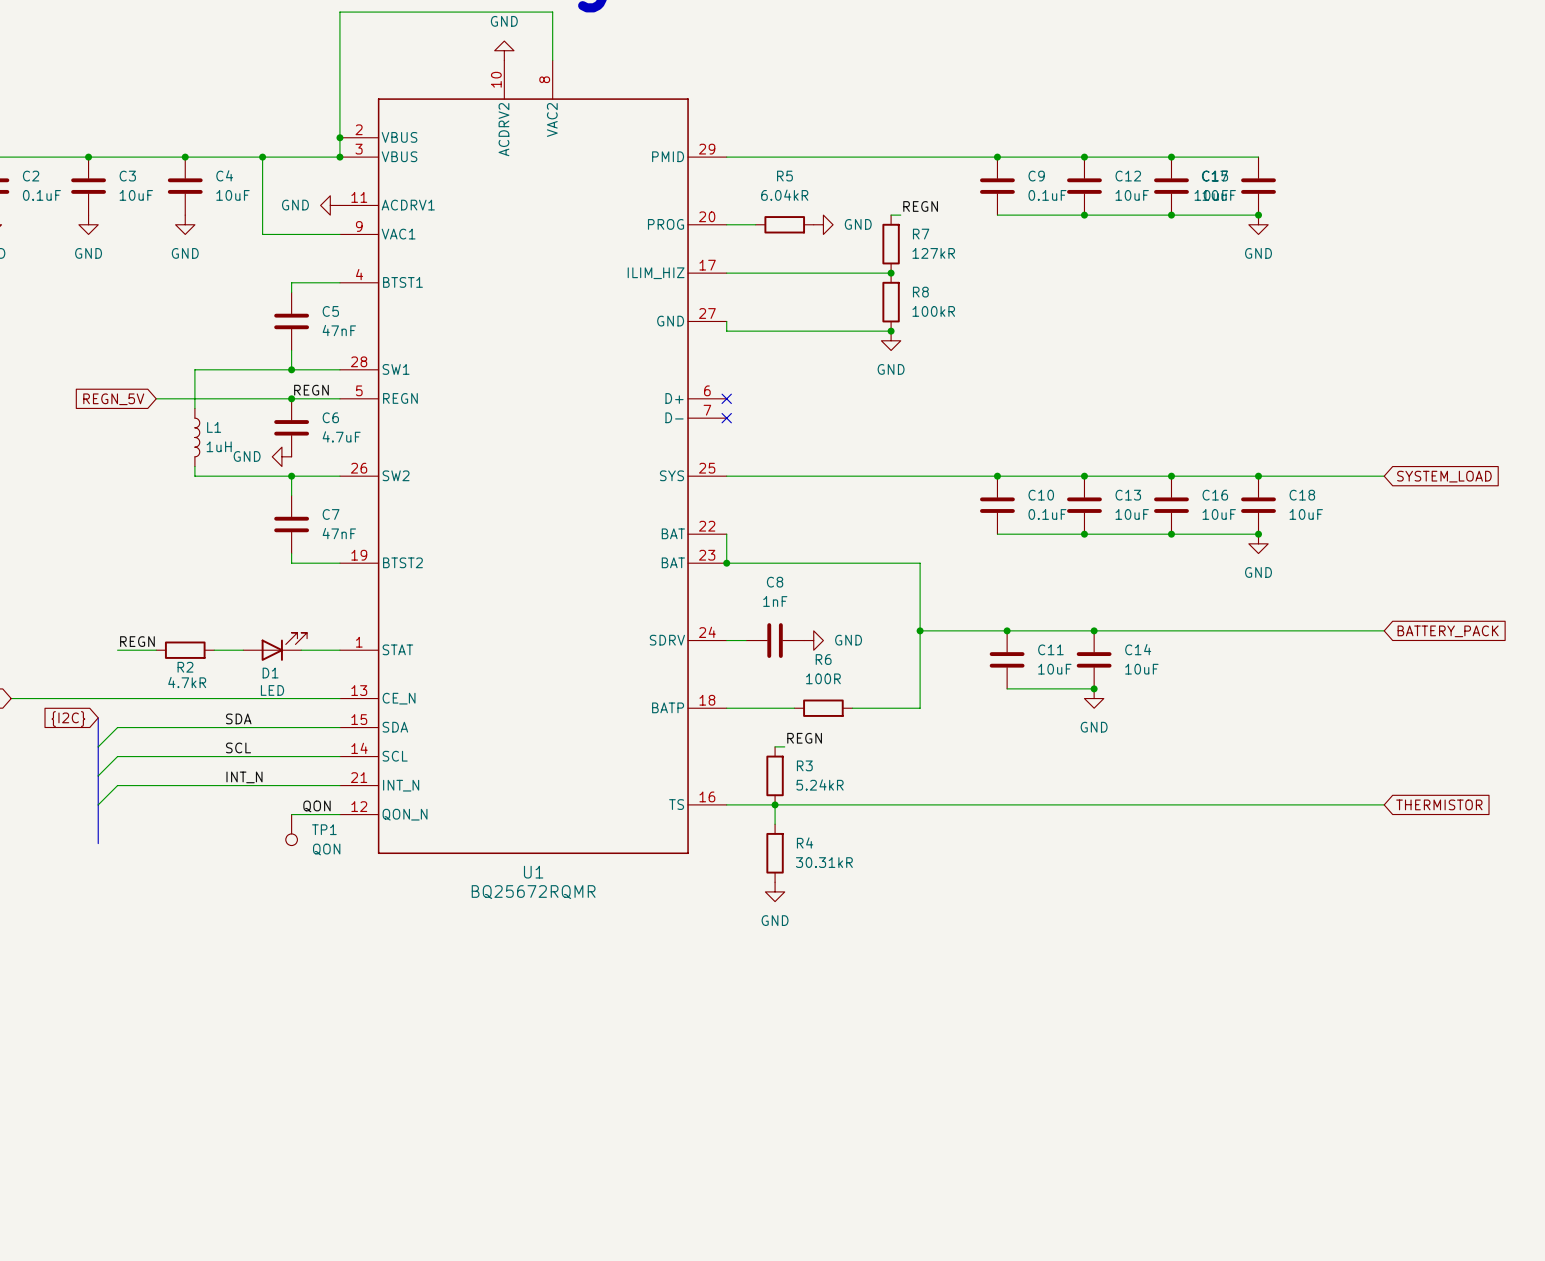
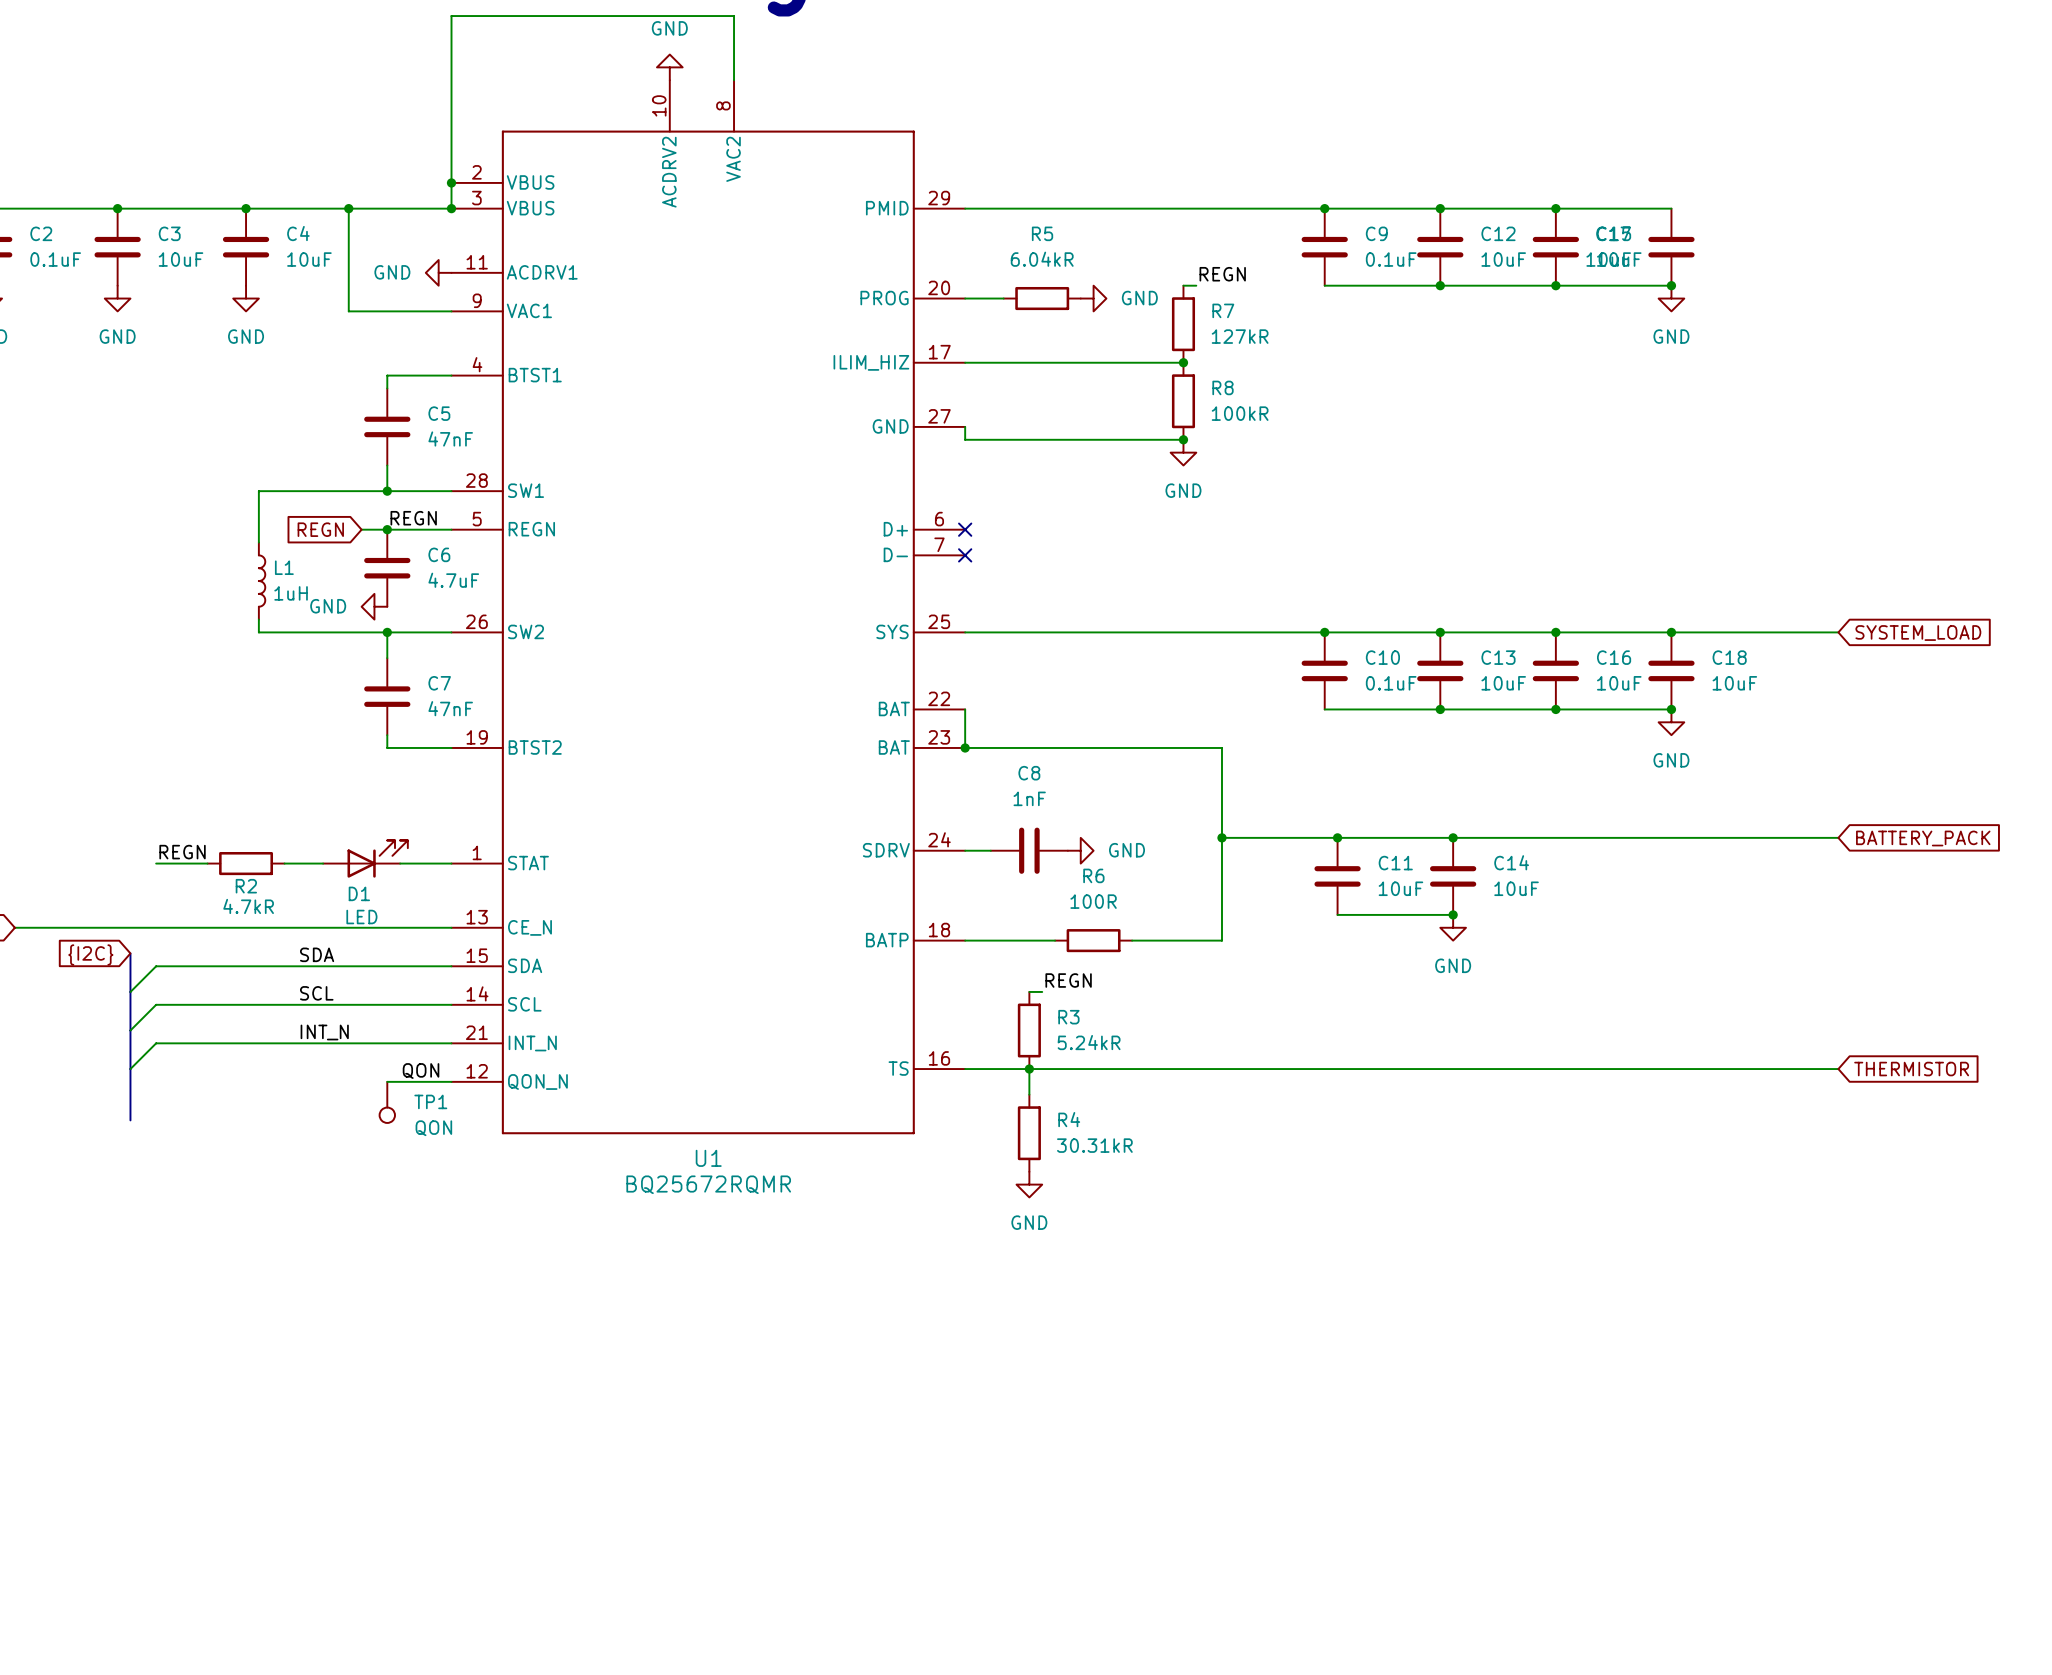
wire: (156, 398) (272, 398) -> none
global label: none -> REGN (320, 529)
global label: REGN_5V (113, 399) -> none

